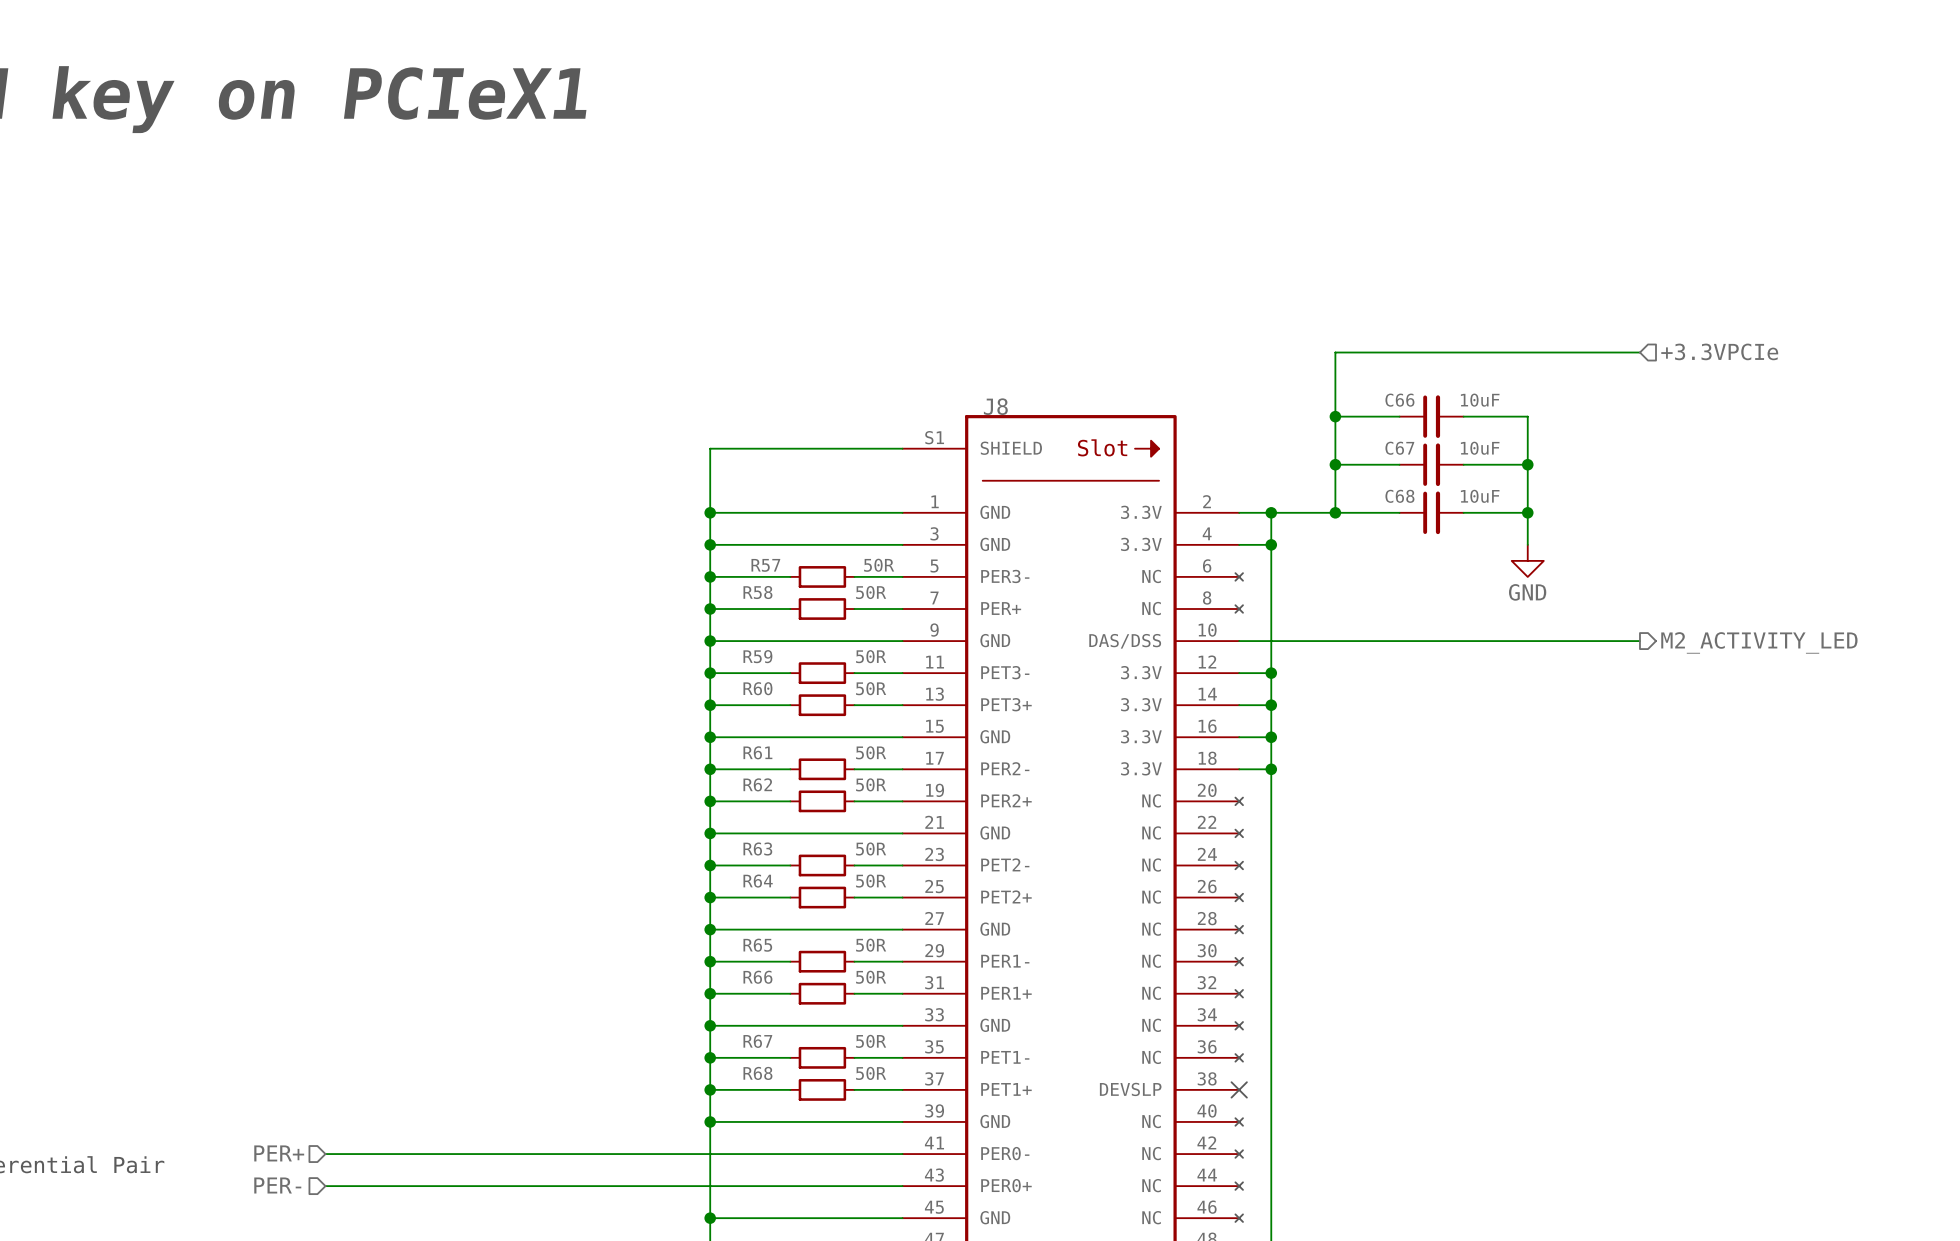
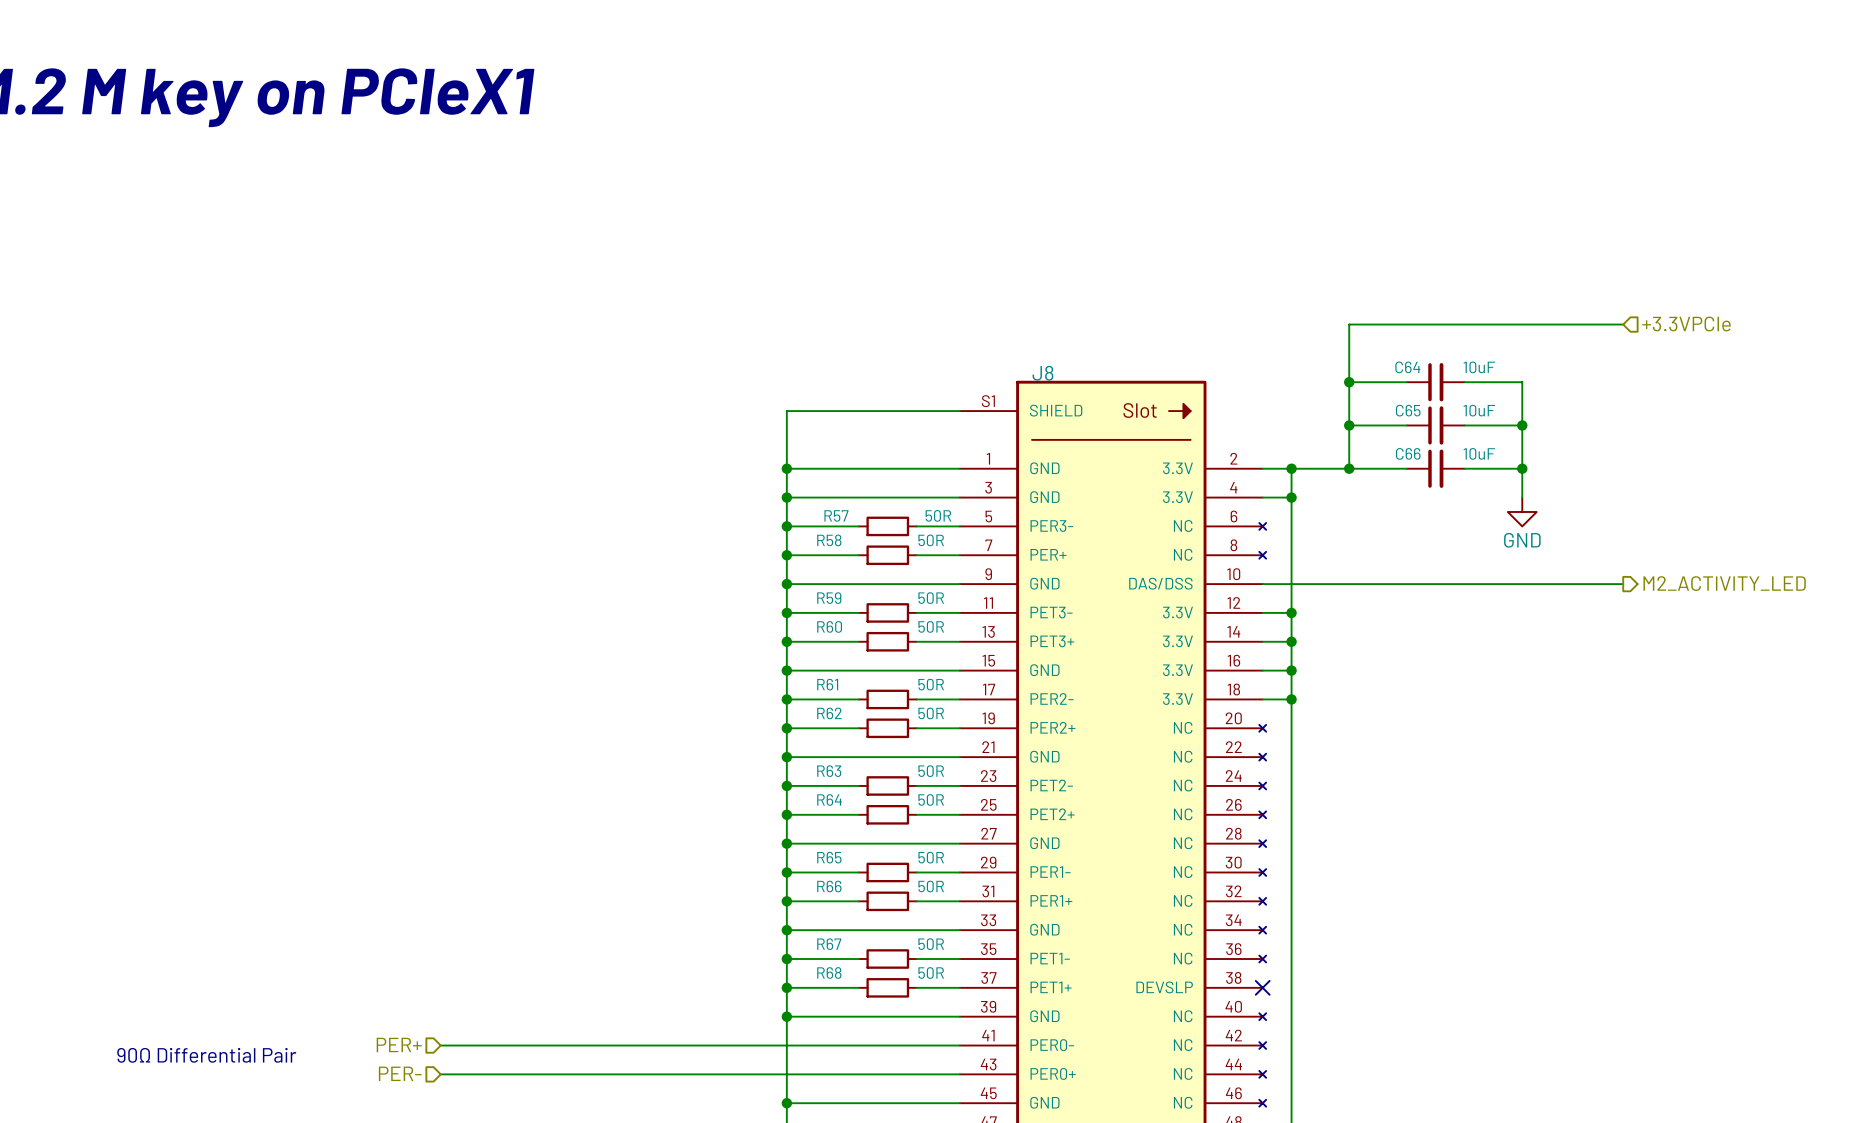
C66 name: C66 (1399, 400) -> C64 (1407, 367)
C67 name: C67 (1399, 448) -> C65 (1408, 410)
C68 name: C68 (1399, 496) -> C66 (1408, 453)

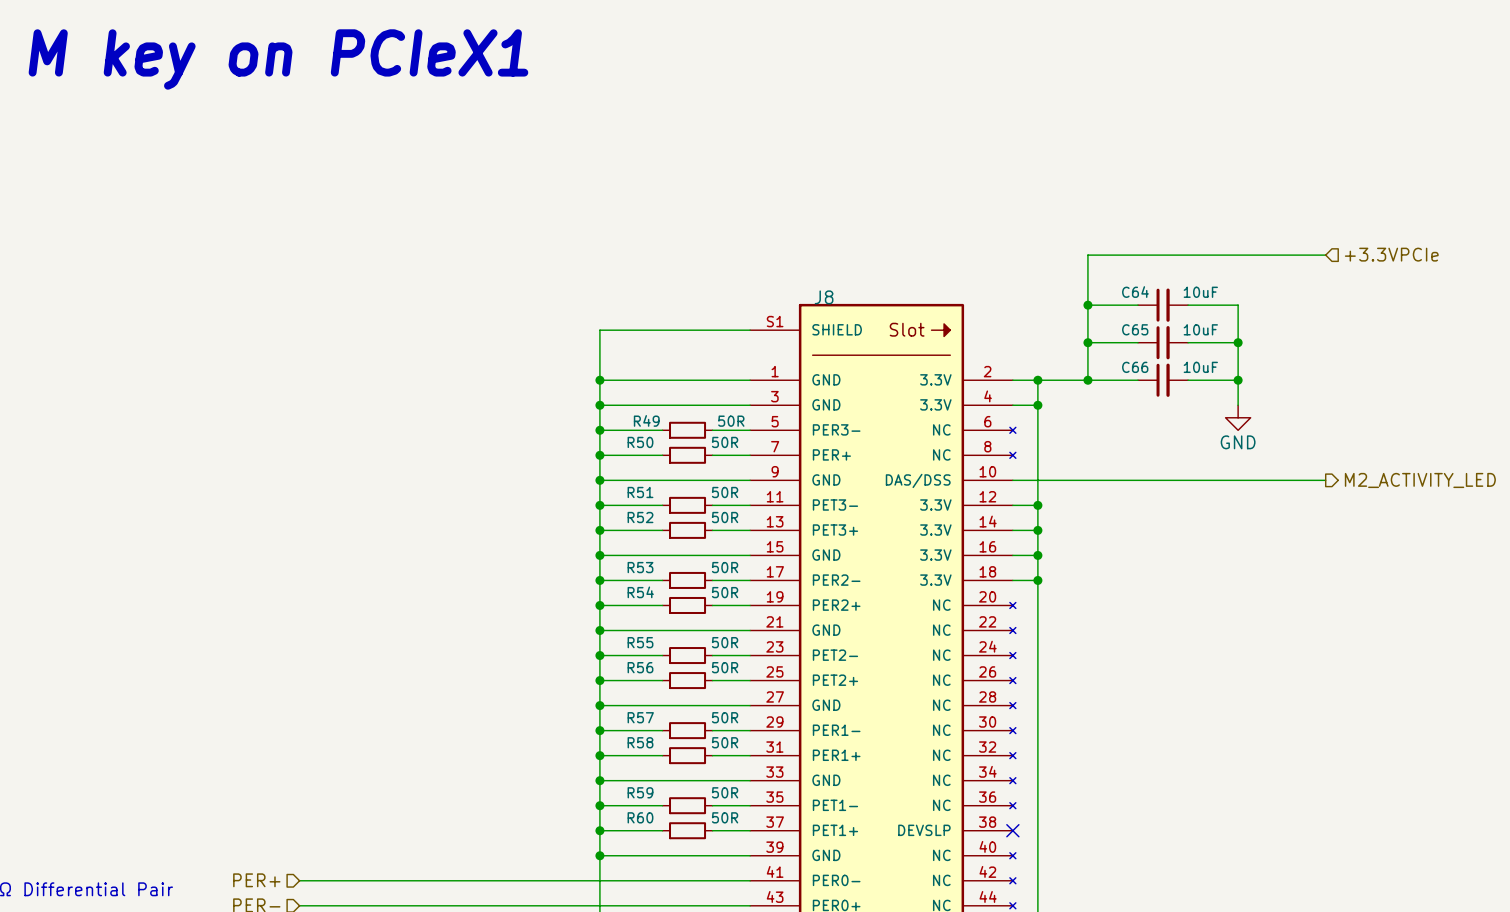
R57 name: R57 (836, 515) -> R49 (646, 420)
R58 name: R58 (829, 540) -> R50 (640, 442)
R59 name: R59 (829, 598) -> R51 (640, 492)
R60 name: R60 (829, 626) -> R52 (640, 517)
R61 name: R61 (827, 684) -> R53 (640, 567)
R62 name: R62 (829, 713) -> R54 (640, 592)
R63 name: R63 (829, 771) -> R55 (640, 642)
R64 name: R64 (829, 799) -> R56 (640, 667)
R65 name: R65 (829, 857) -> R57 (640, 717)
R66 name: R66 (829, 886) -> R58 (640, 742)
R67 name: R67 (829, 944) -> R59 (640, 792)
R68 name: R68 (829, 972) -> R60 (640, 817)

